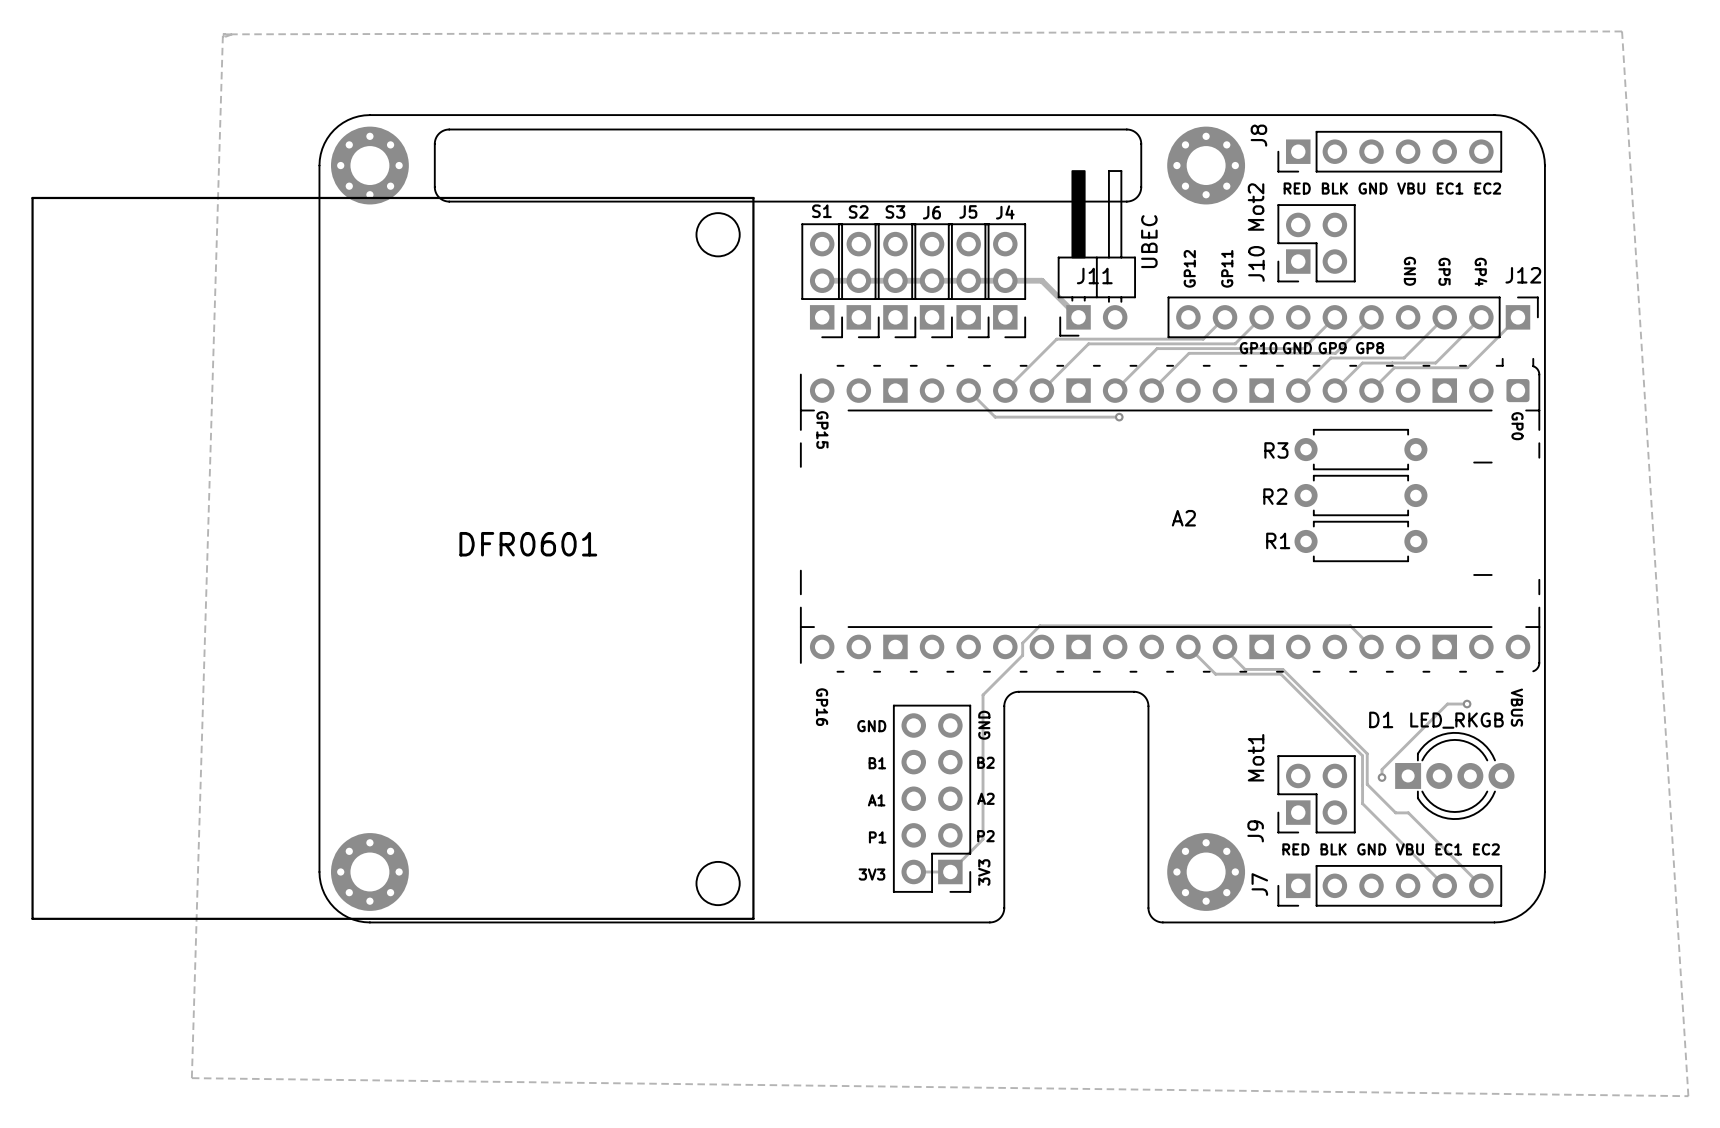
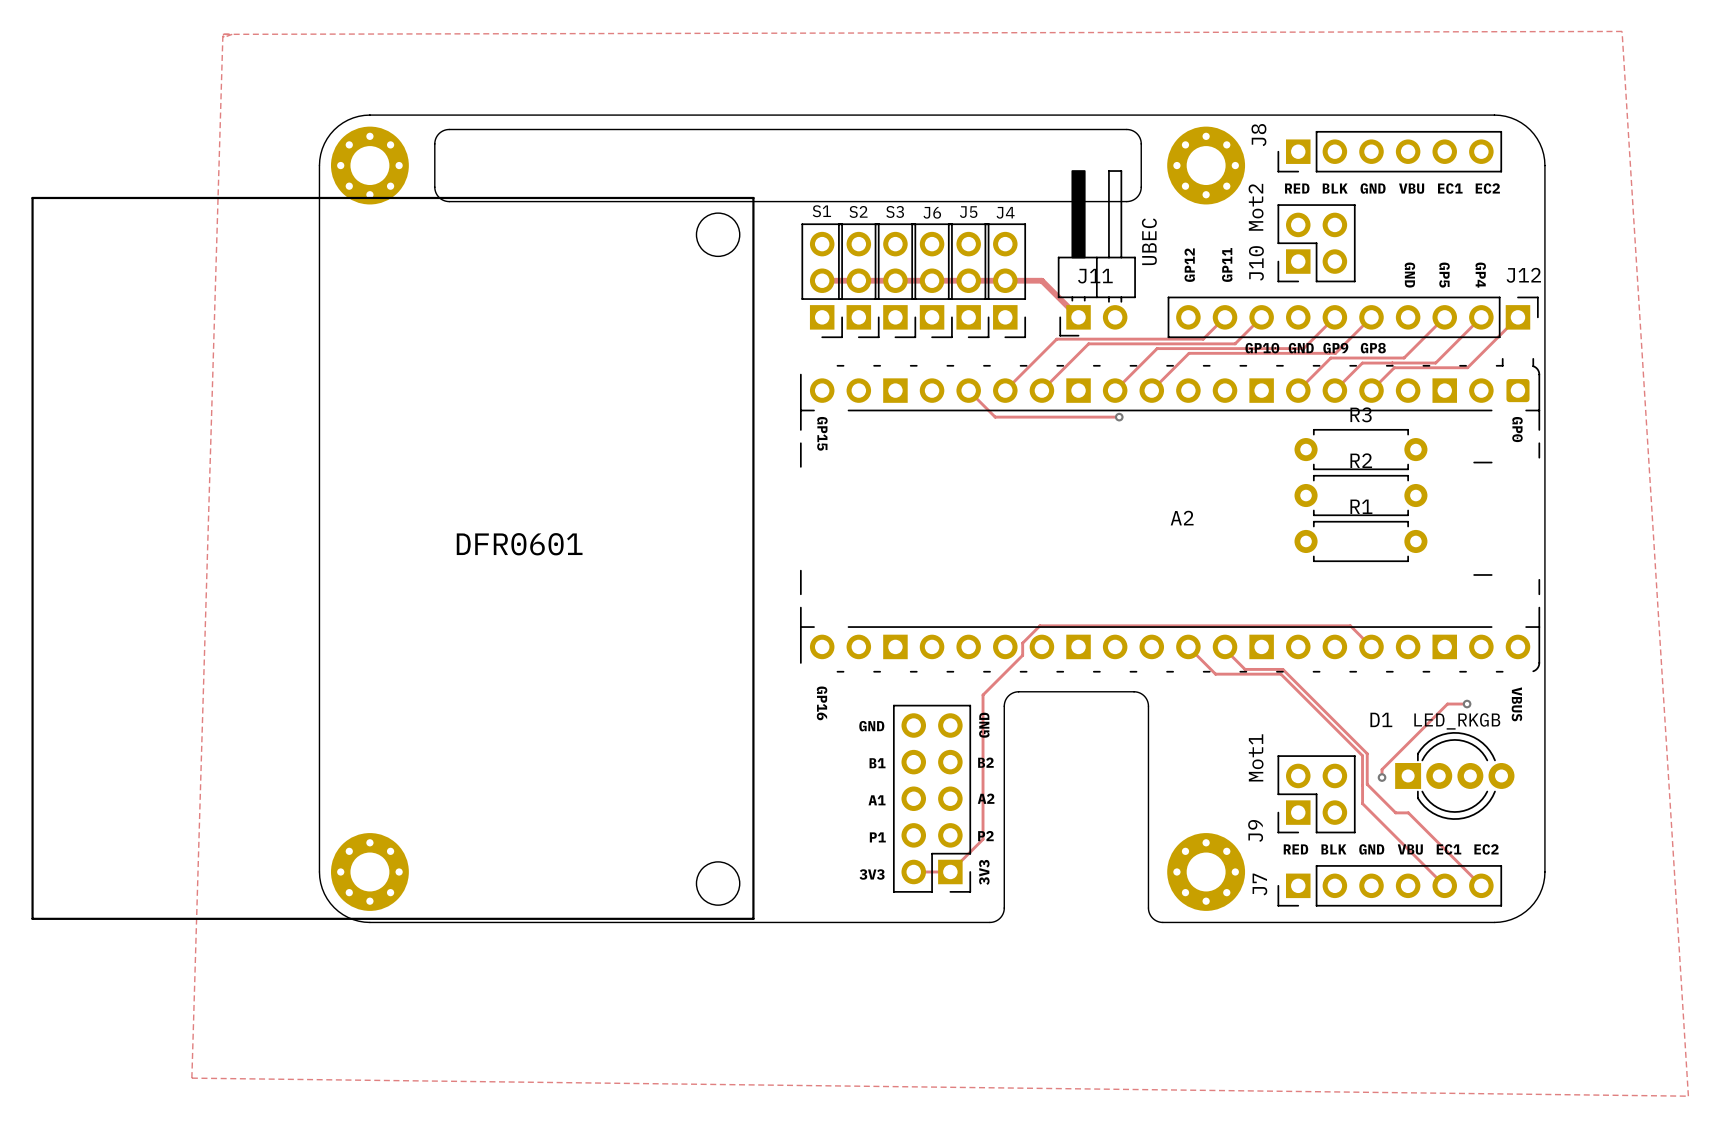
R3 name position: R3 (1276, 450) -> R3 (1361, 414)
R2 name position: R2 (1275, 496) -> R2 (1361, 460)
R1 name position: R1 (1278, 540) -> R1 (1361, 506)

